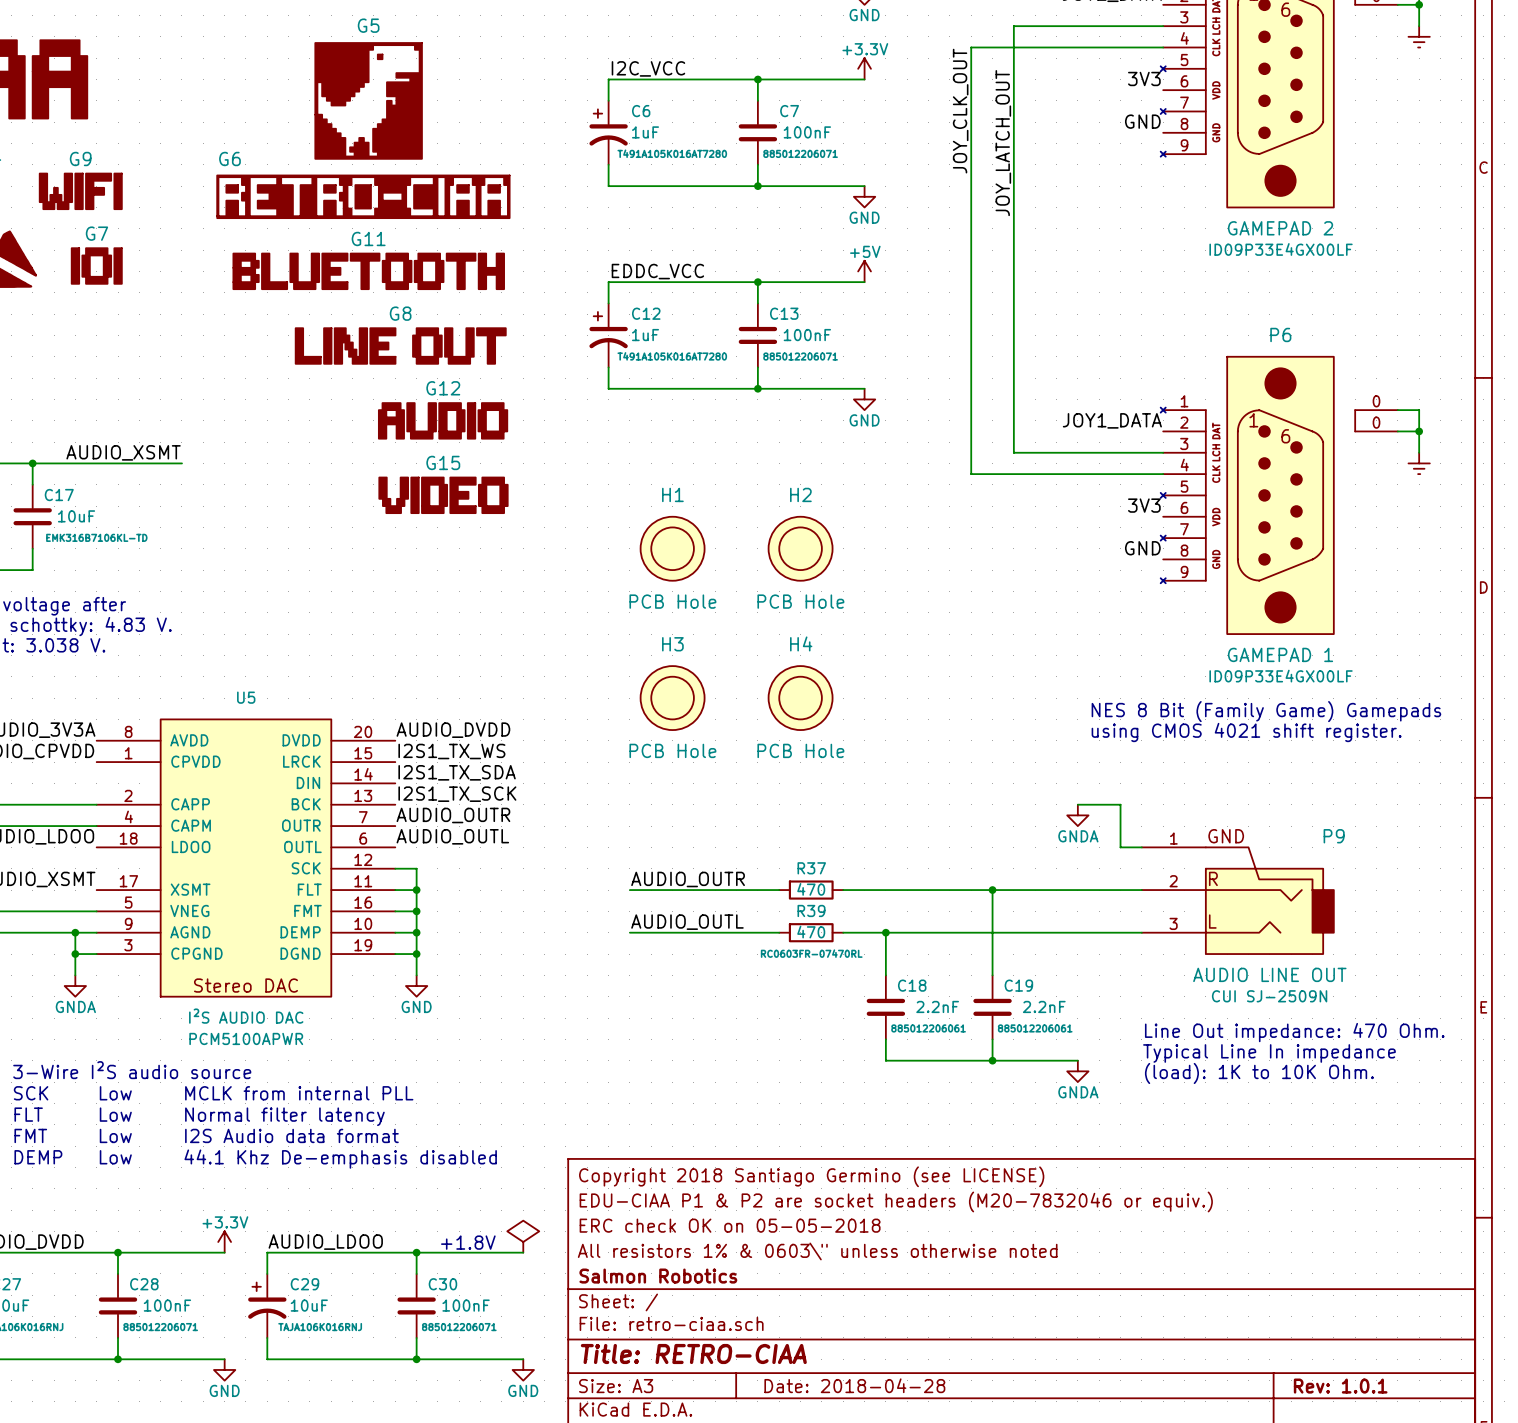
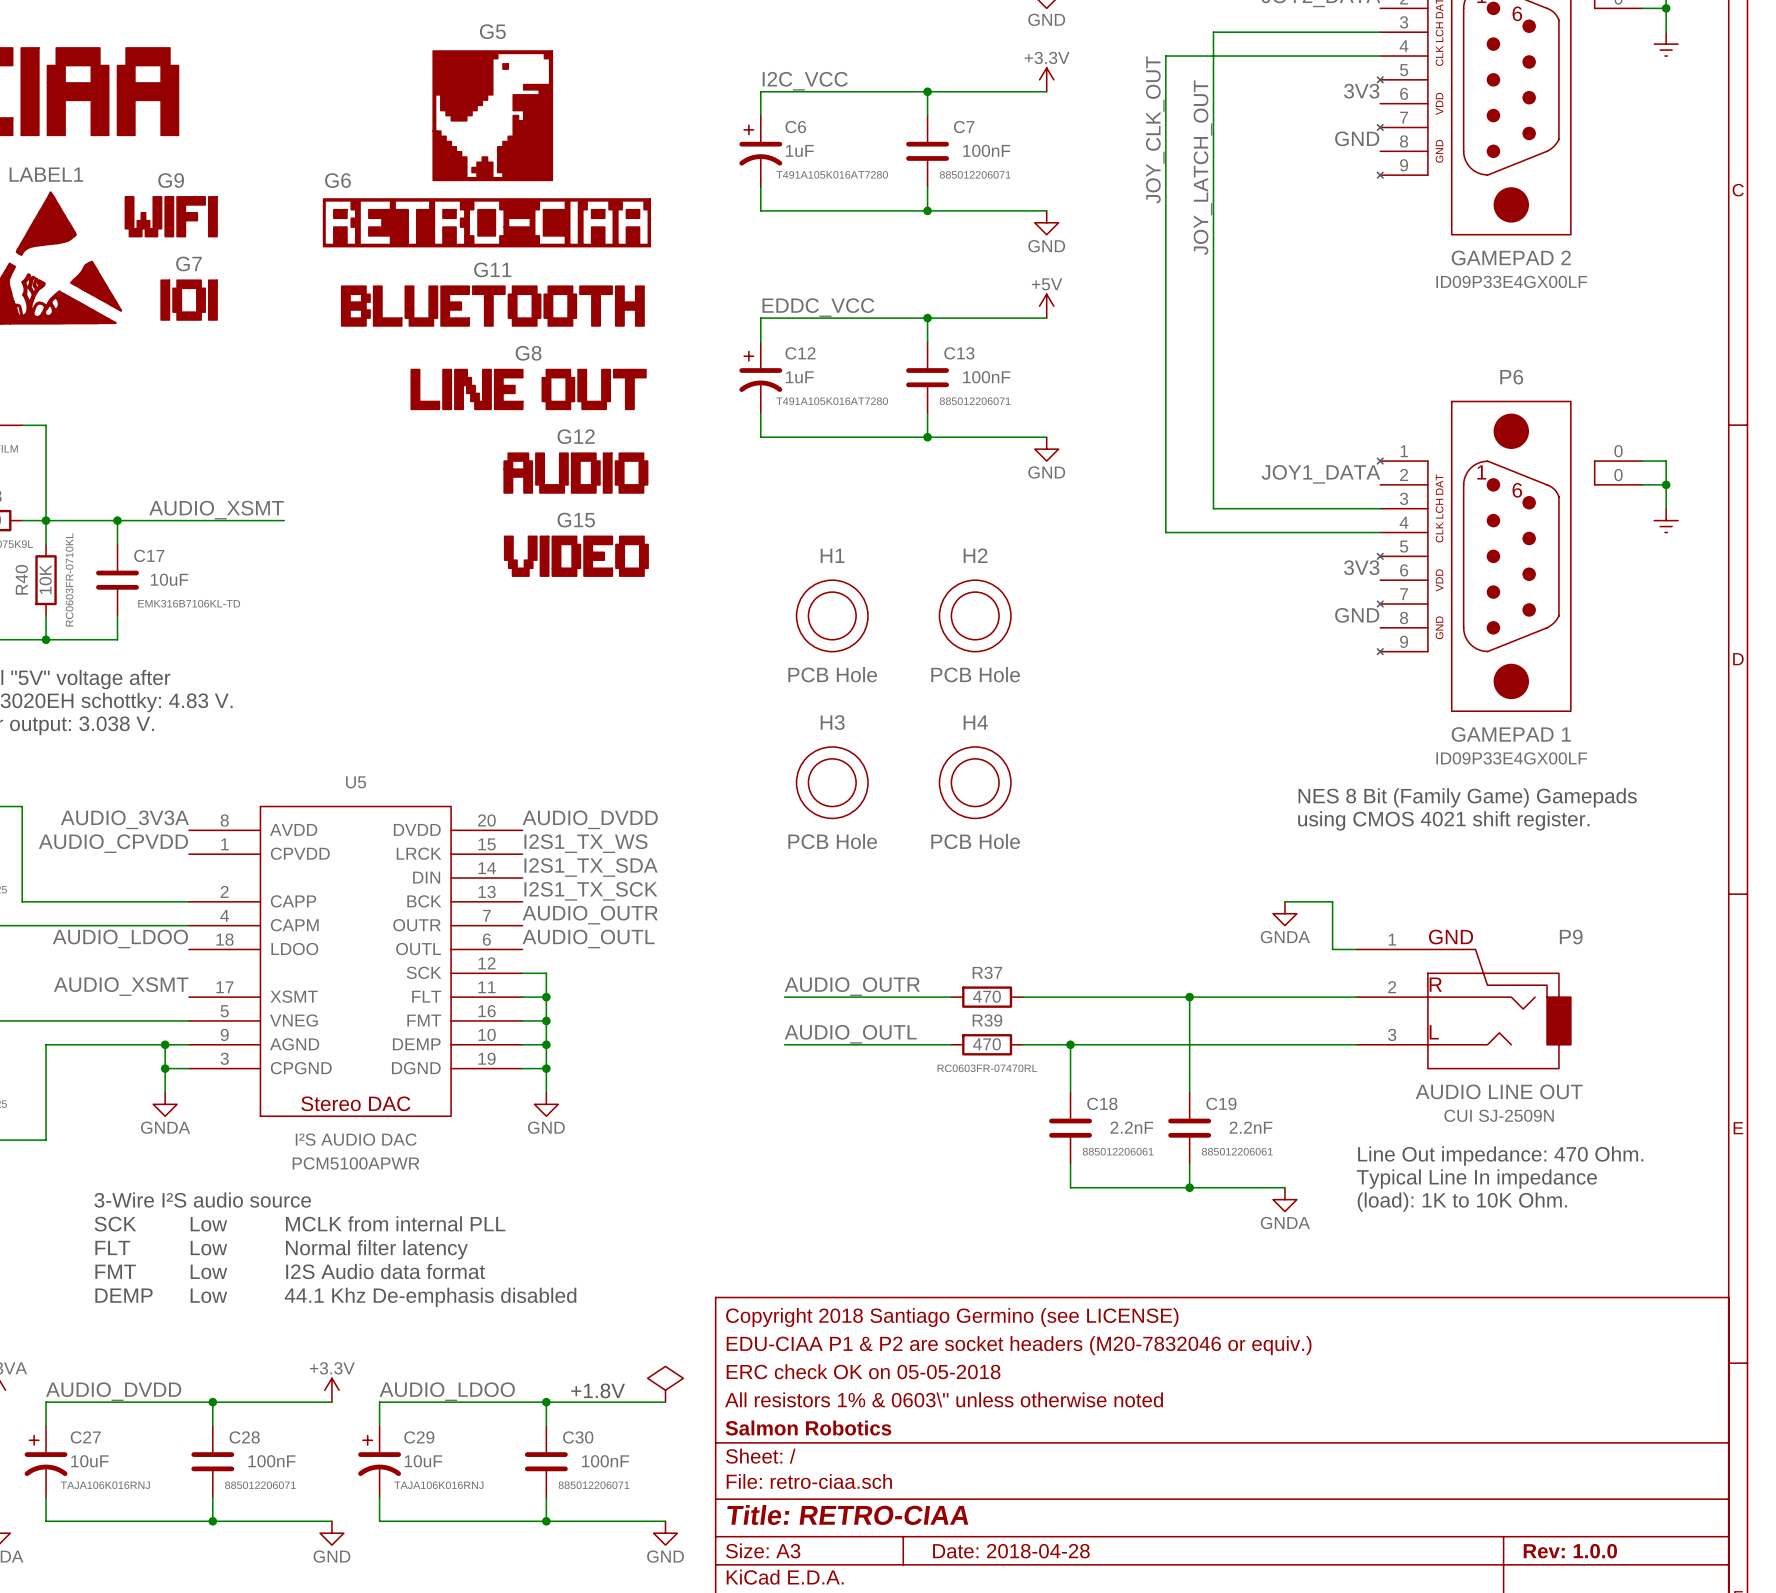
title block: Rev: 1.0.1 (1340, 1386) -> Rev: 1.0.0 (1570, 1551)

